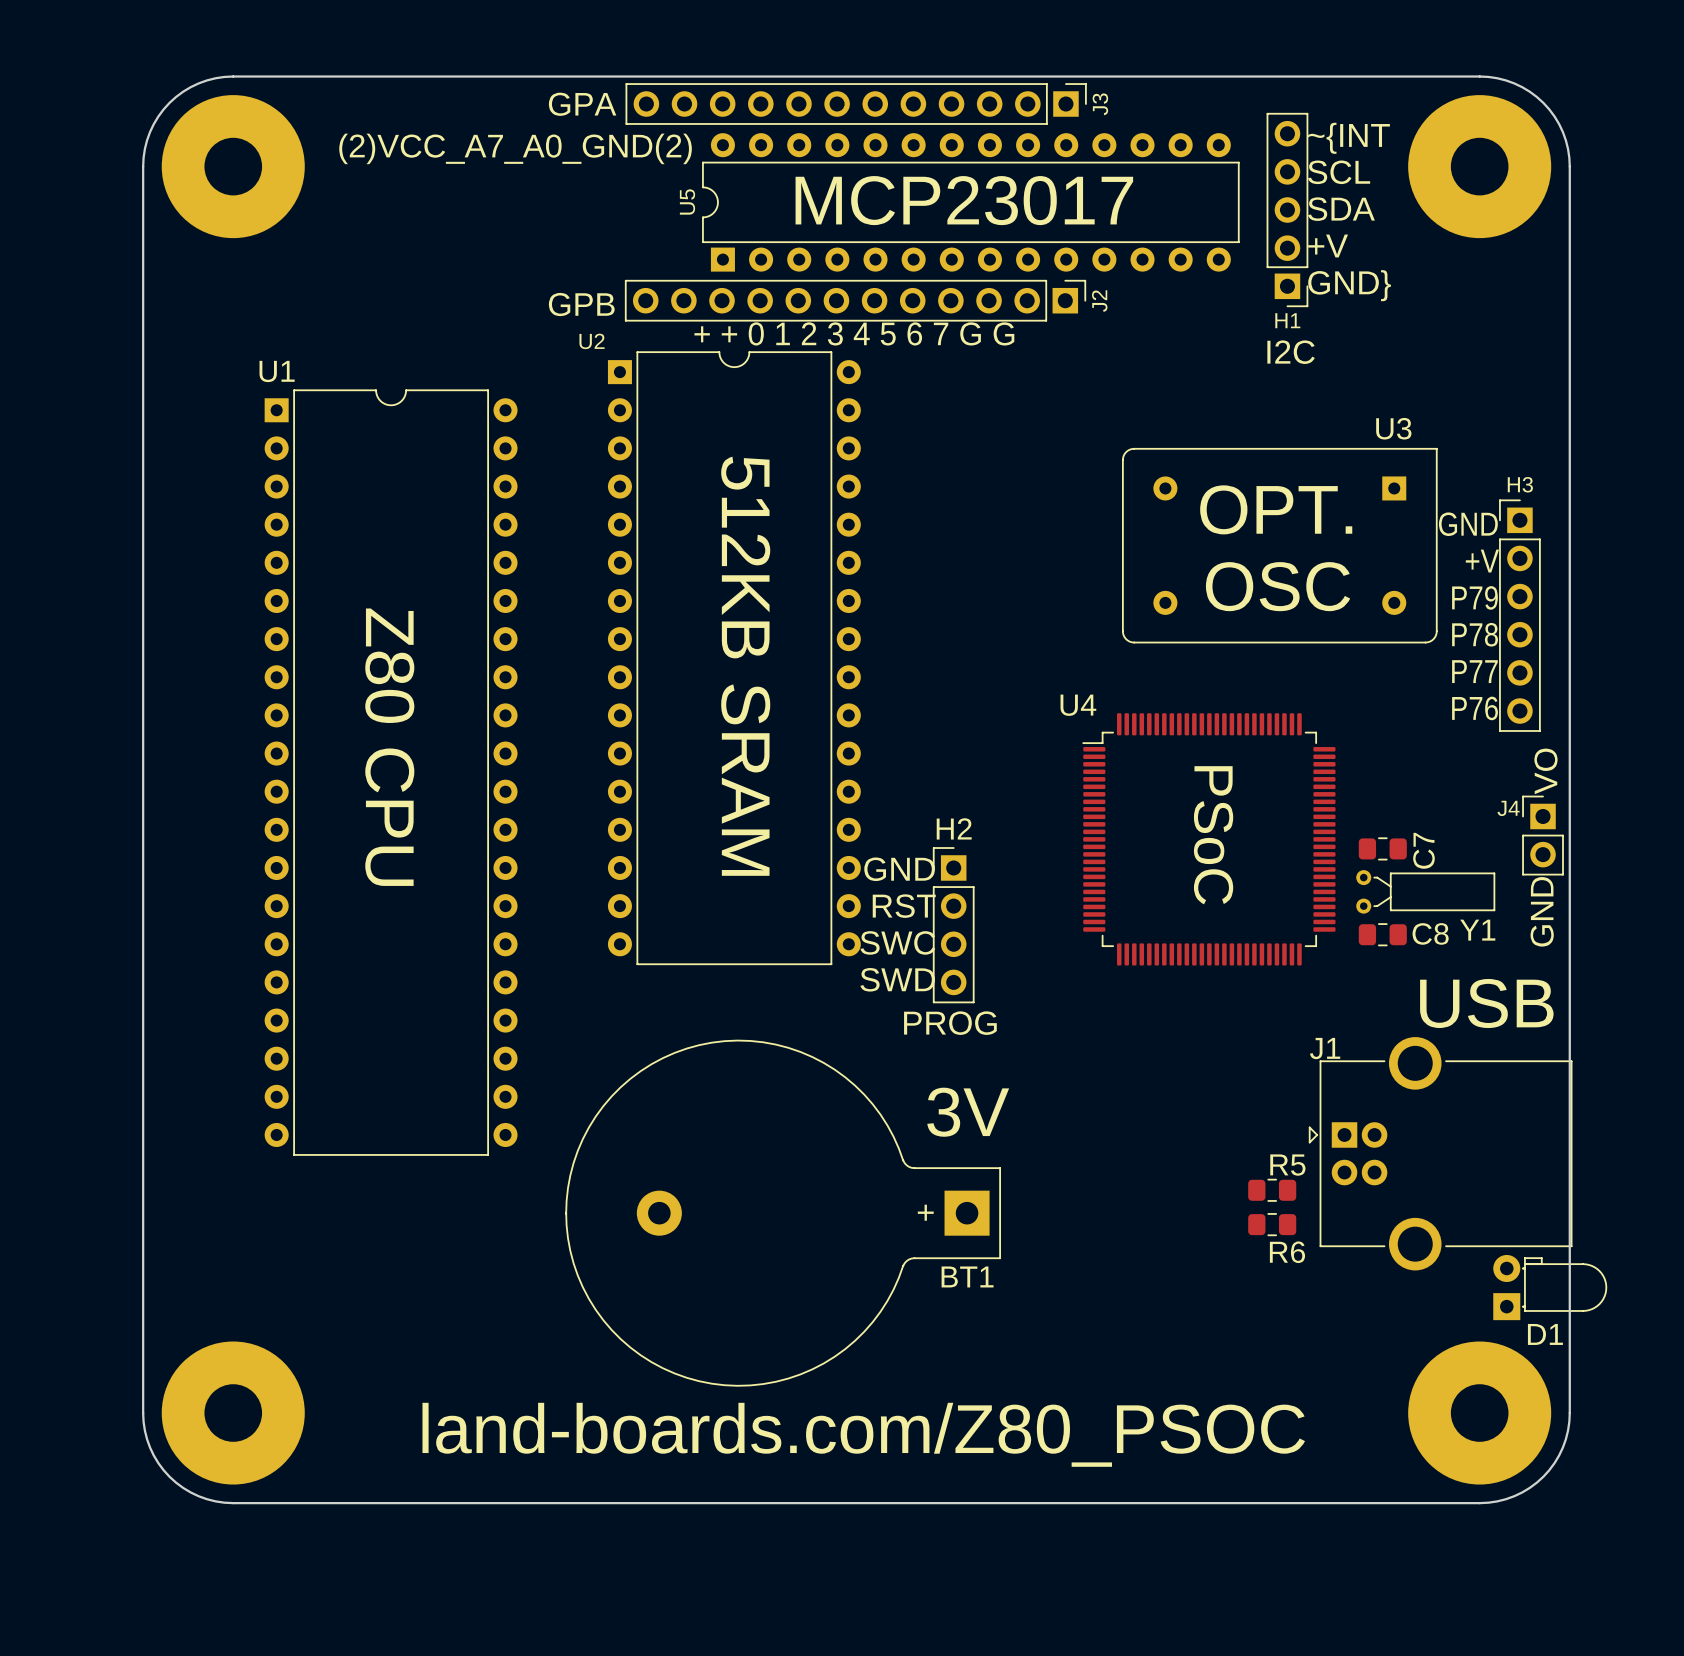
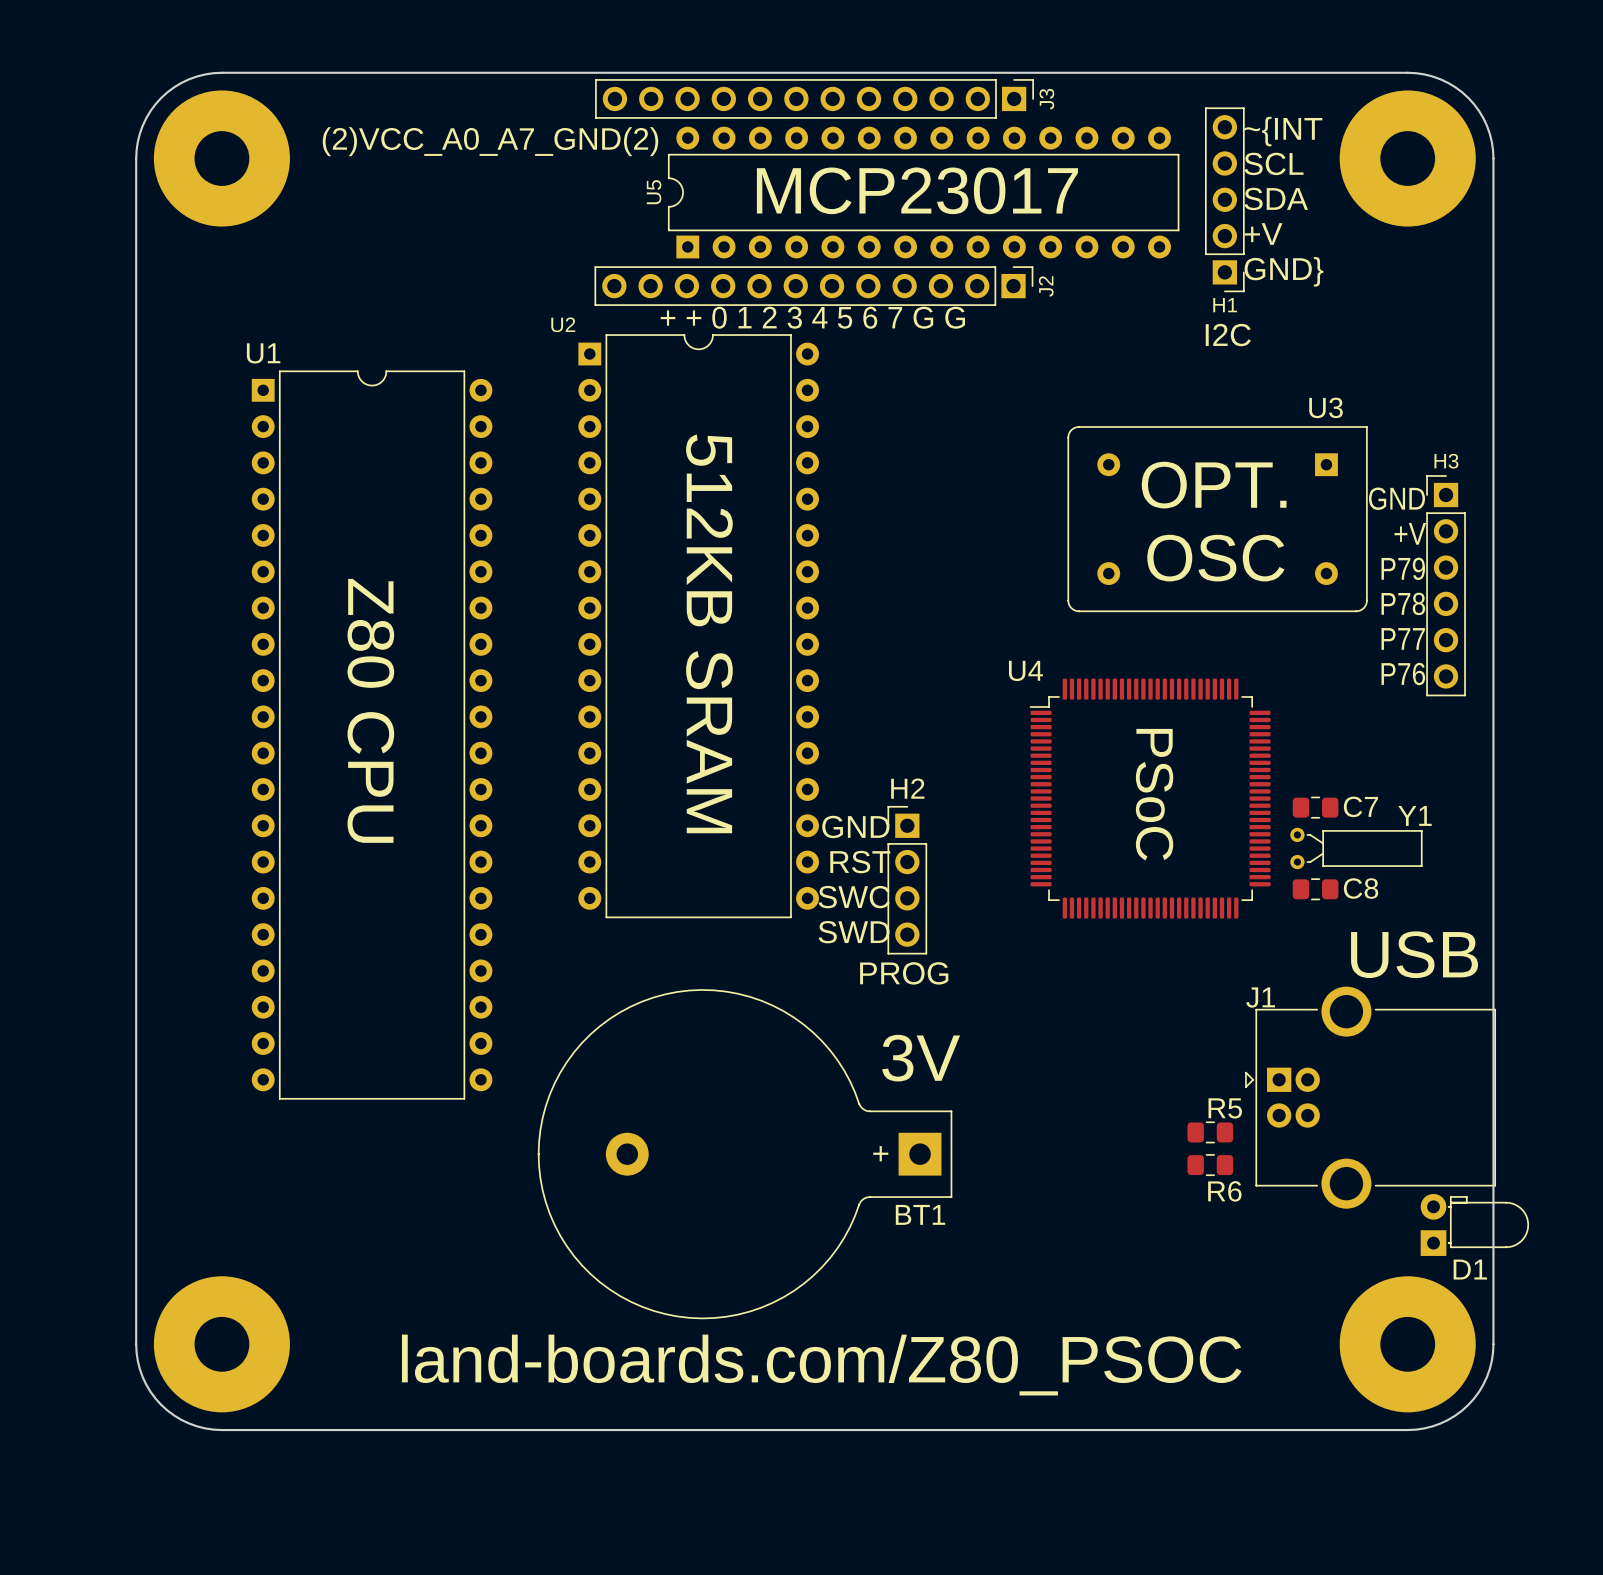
text: GPA (582, 104) -> none
text: (2)VCC_A7_A0_GND(2) (515, 148) -> (2)VCC_A0_A7_GND(2) (490, 141)
text: GPB (581, 304) -> none
text: VO (1545, 771) -> none
J4: (1543, 835) -> none
C7 name rotation: 0° (1423, 850) -> 90° clockwise (1360, 806)
text: GND (1542, 911) -> none
Y1 name position: Y1 (1477, 930) -> Y1 (1414, 815)

